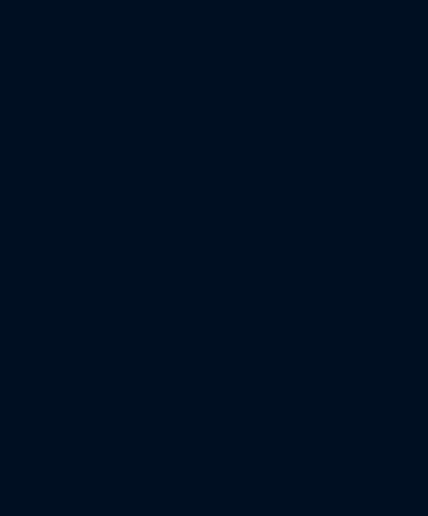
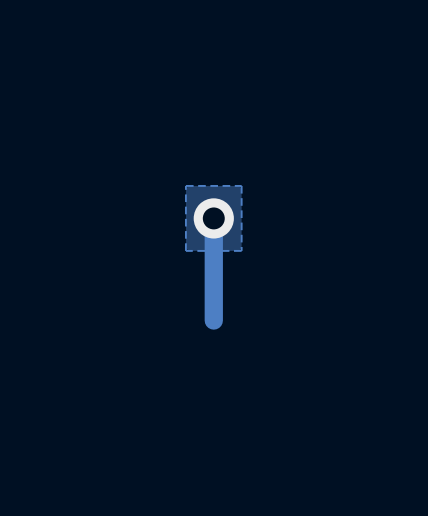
zone outline: none -> (241, 185) (185, 185) (185, 250) (241, 250) (241, 185)
track: none -> (213, 218) (213, 320)
via: none -> (213, 218)

